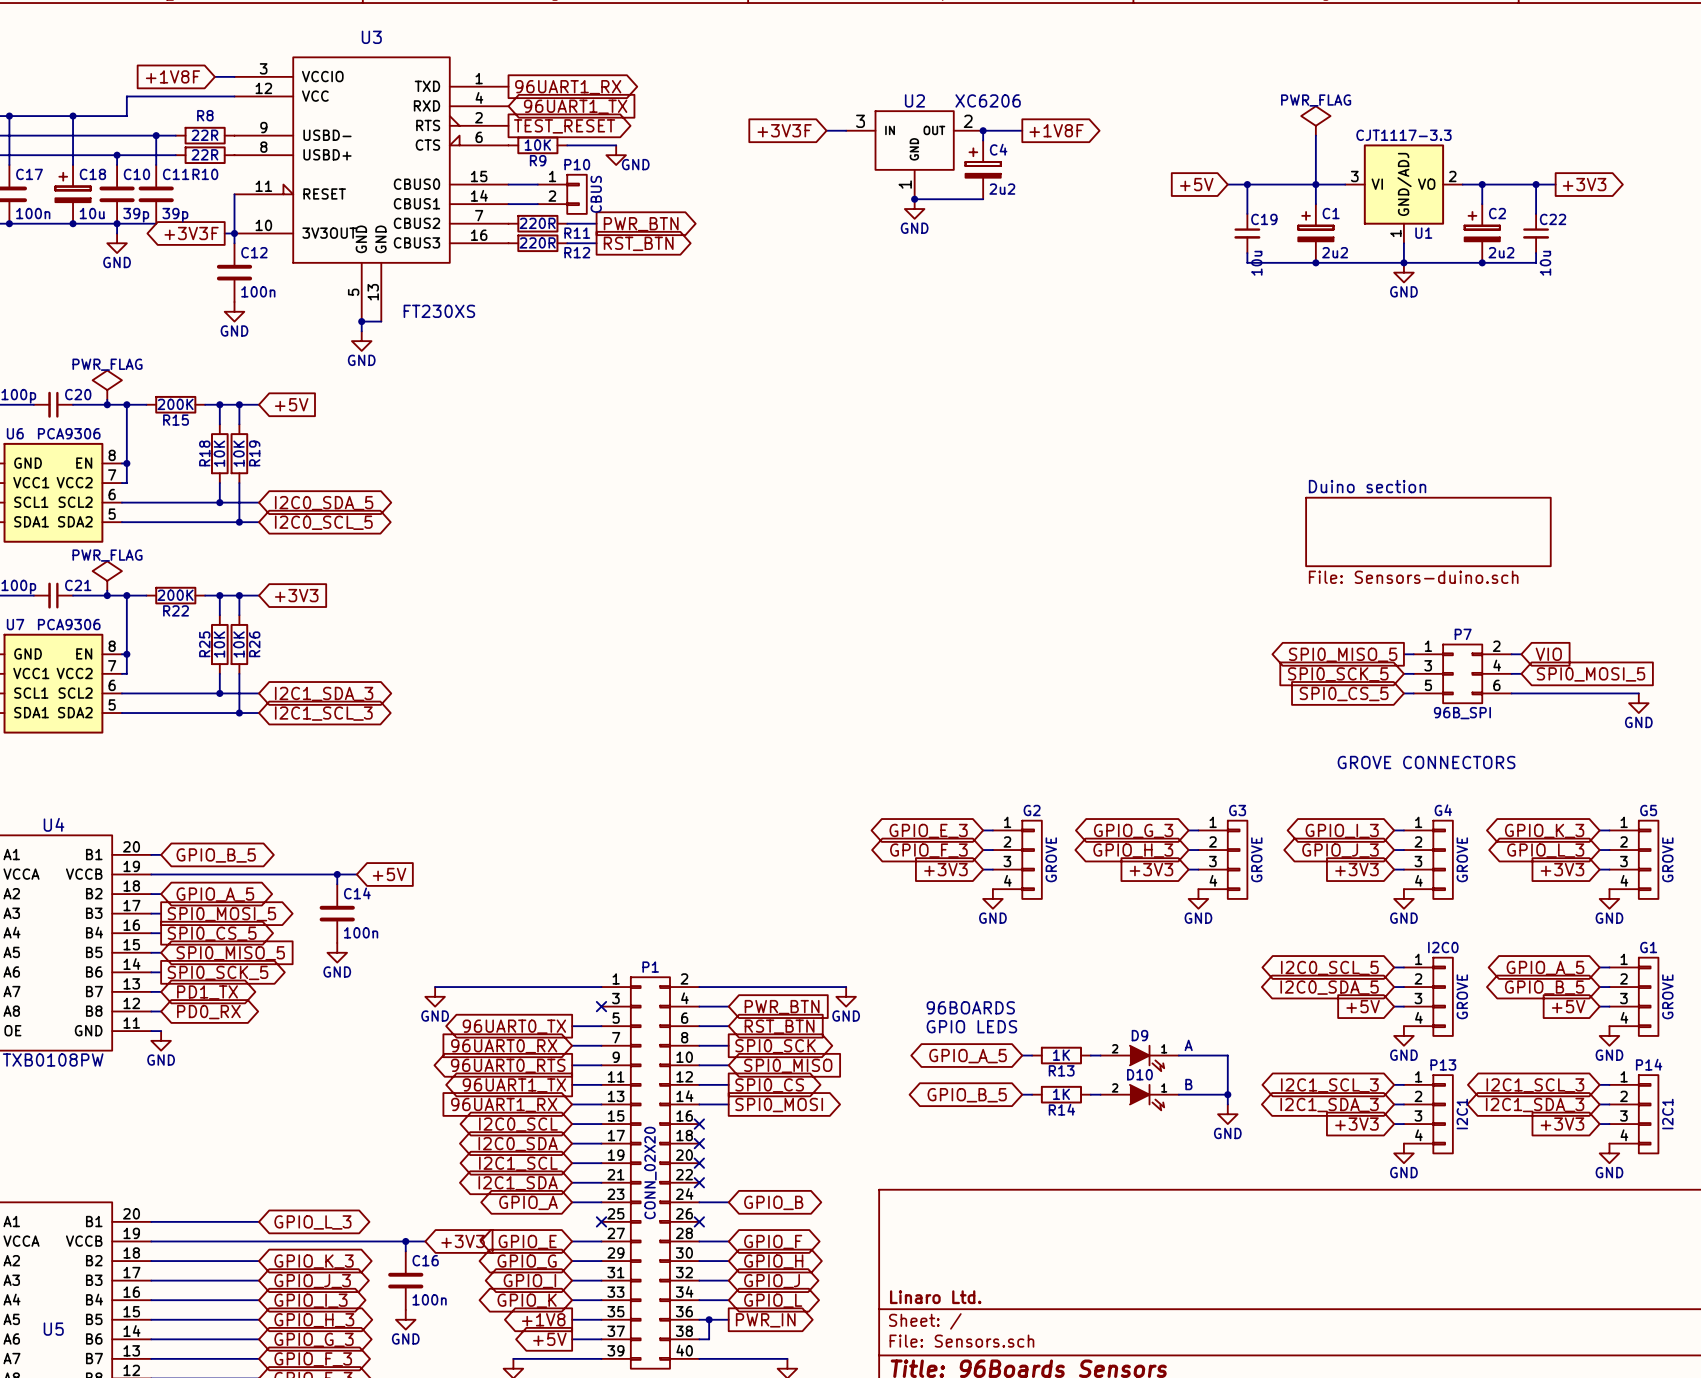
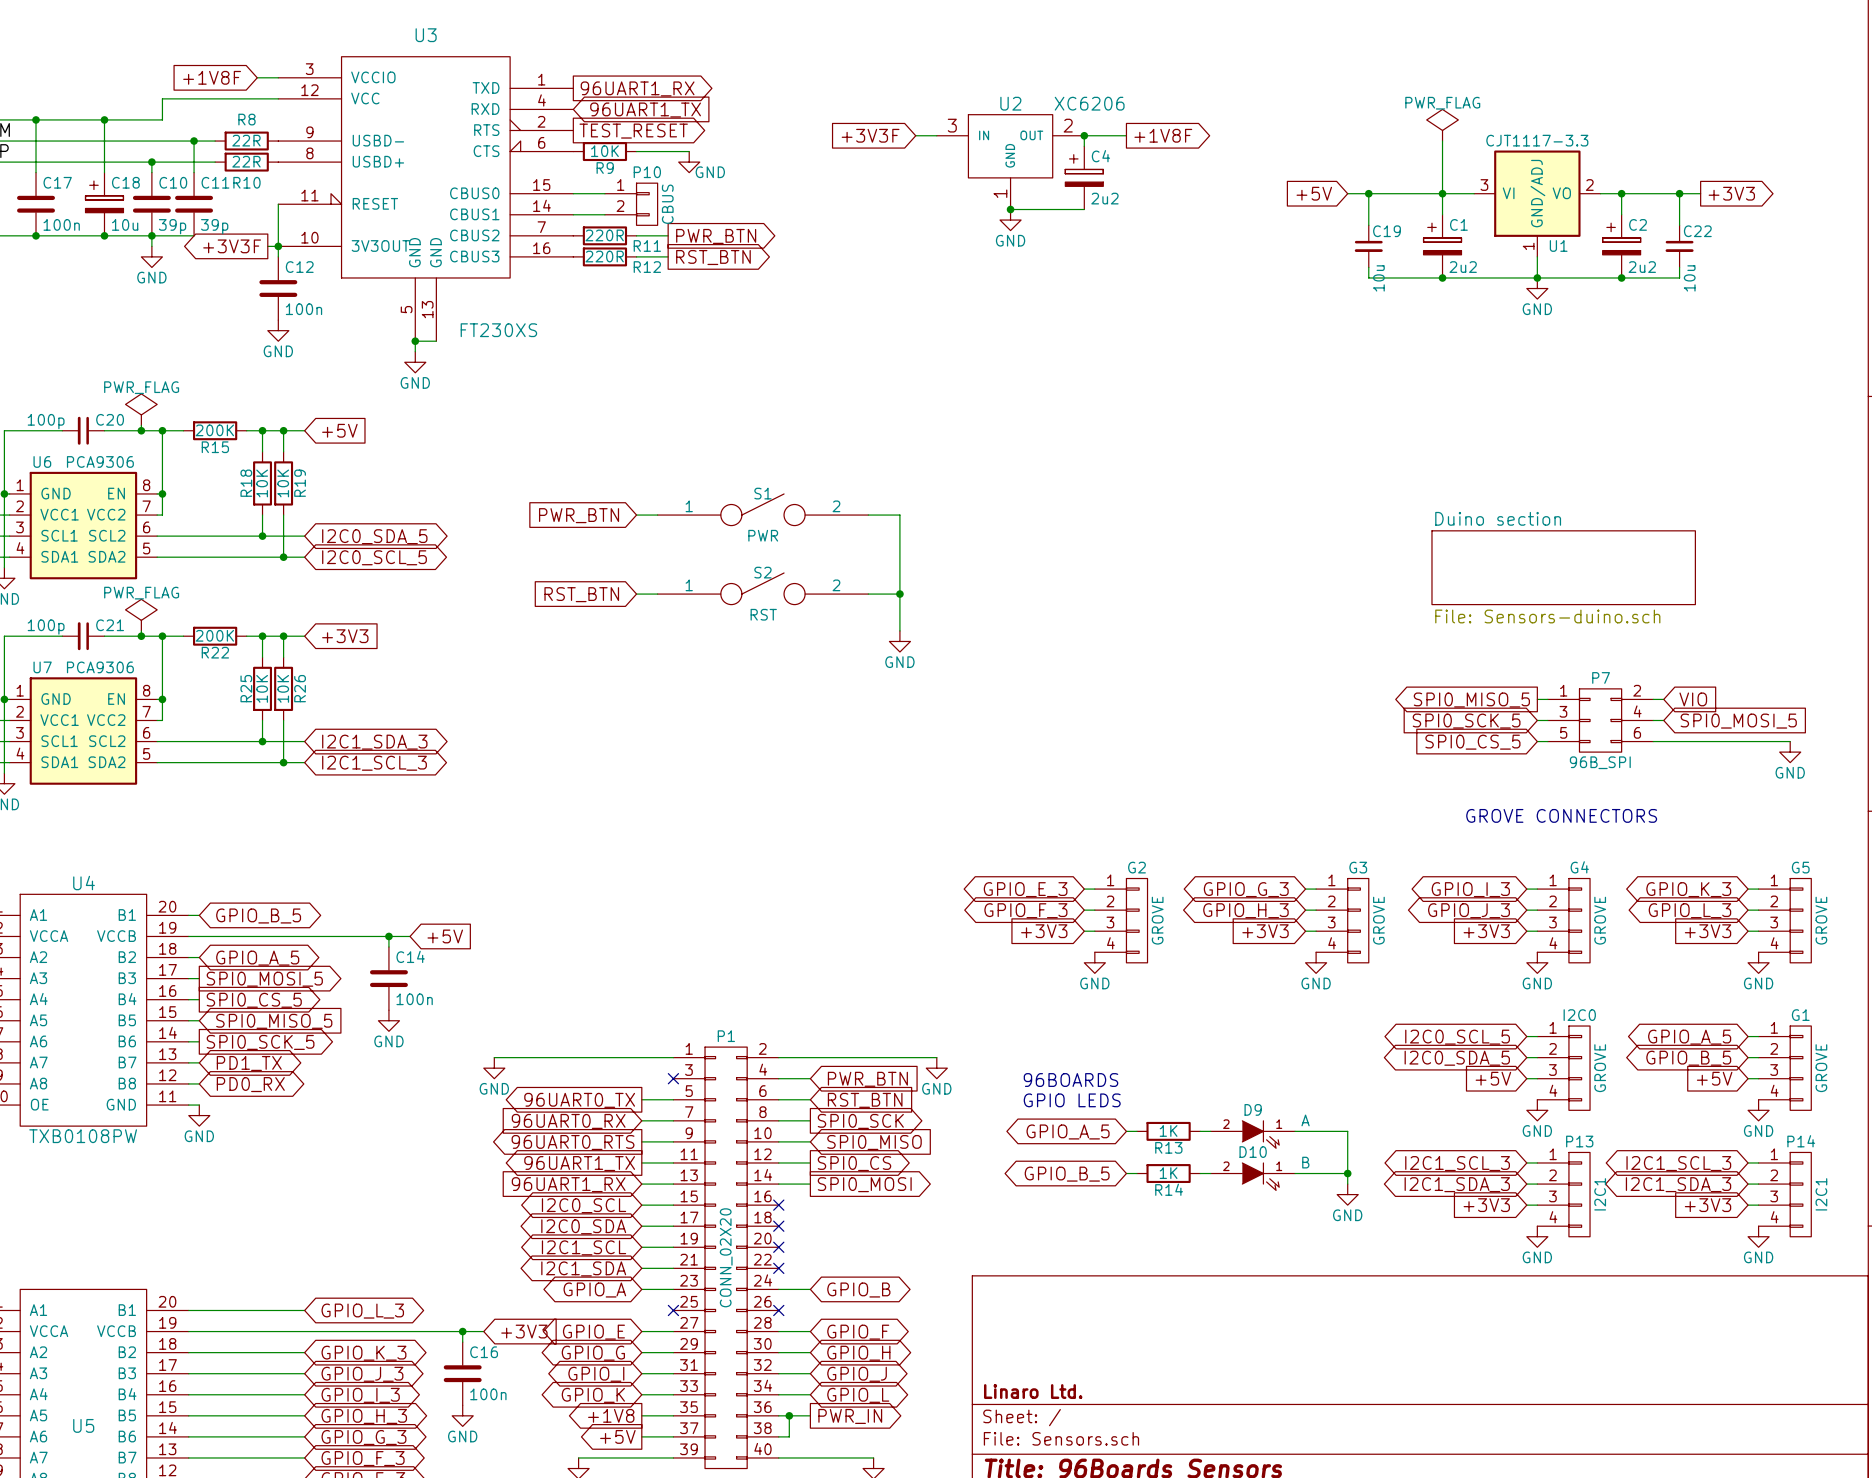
S1: none -> PWR (762, 509)
global label: none -> PWR_BTN (579, 515)
wire: none -> (636, 515) (657, 515)
wire: none -> (868, 515) (899, 515) (899, 630)
S2: none -> RST (762, 588)
global label: none -> RST_BTN (581, 594)
wire: none -> (636, 594) (657, 594)
wire: none -> (868, 594) (899, 594)
junction: none -> (899, 594)
power symbol: none -> GND (899, 641)

